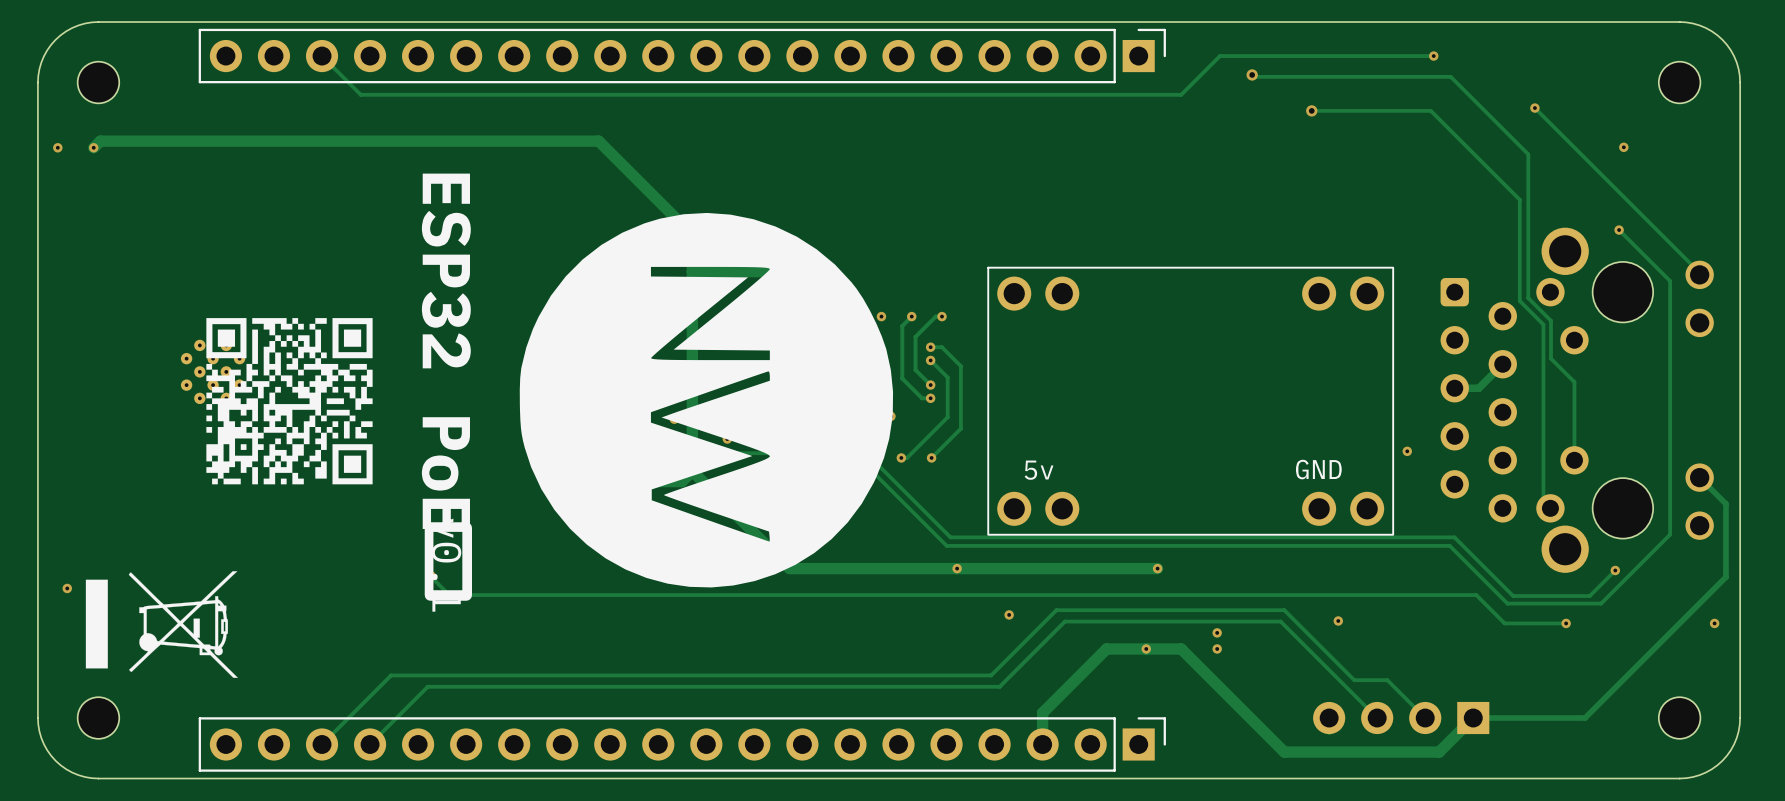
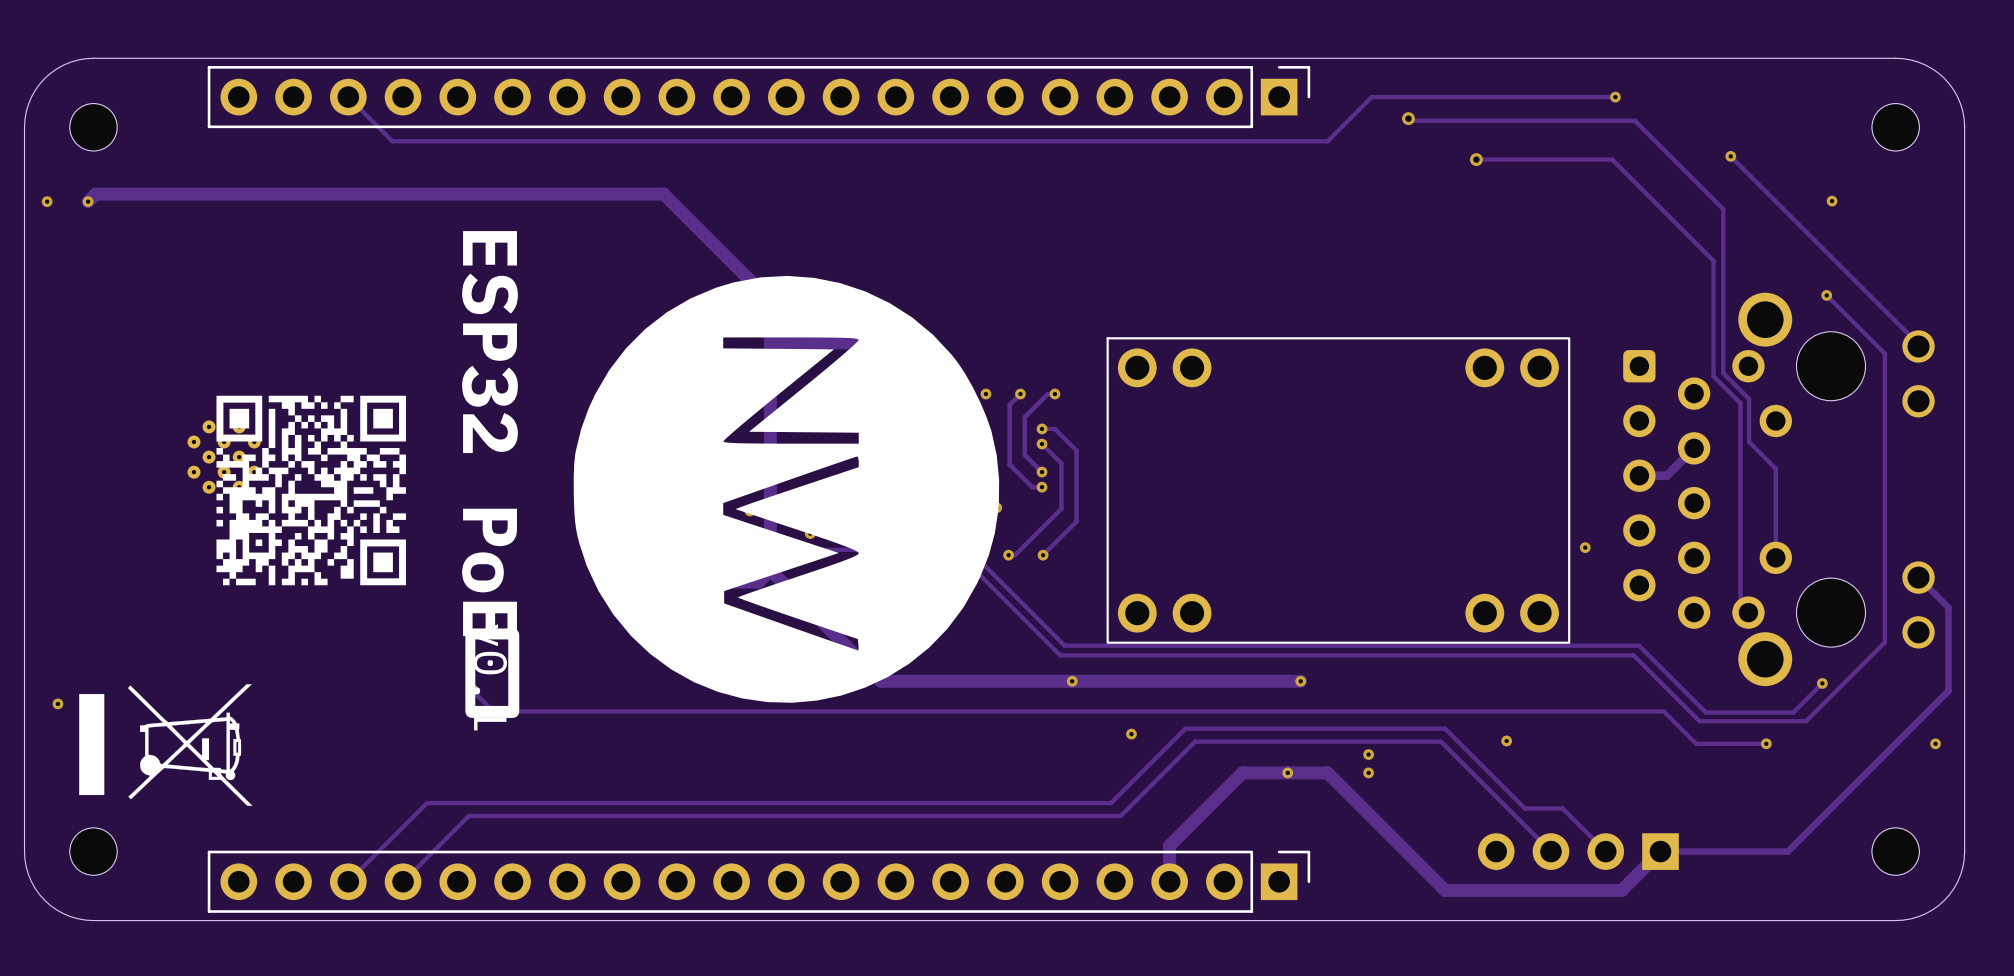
text: GND (1318, 469) -> none
text: 5v (1039, 470) -> none

